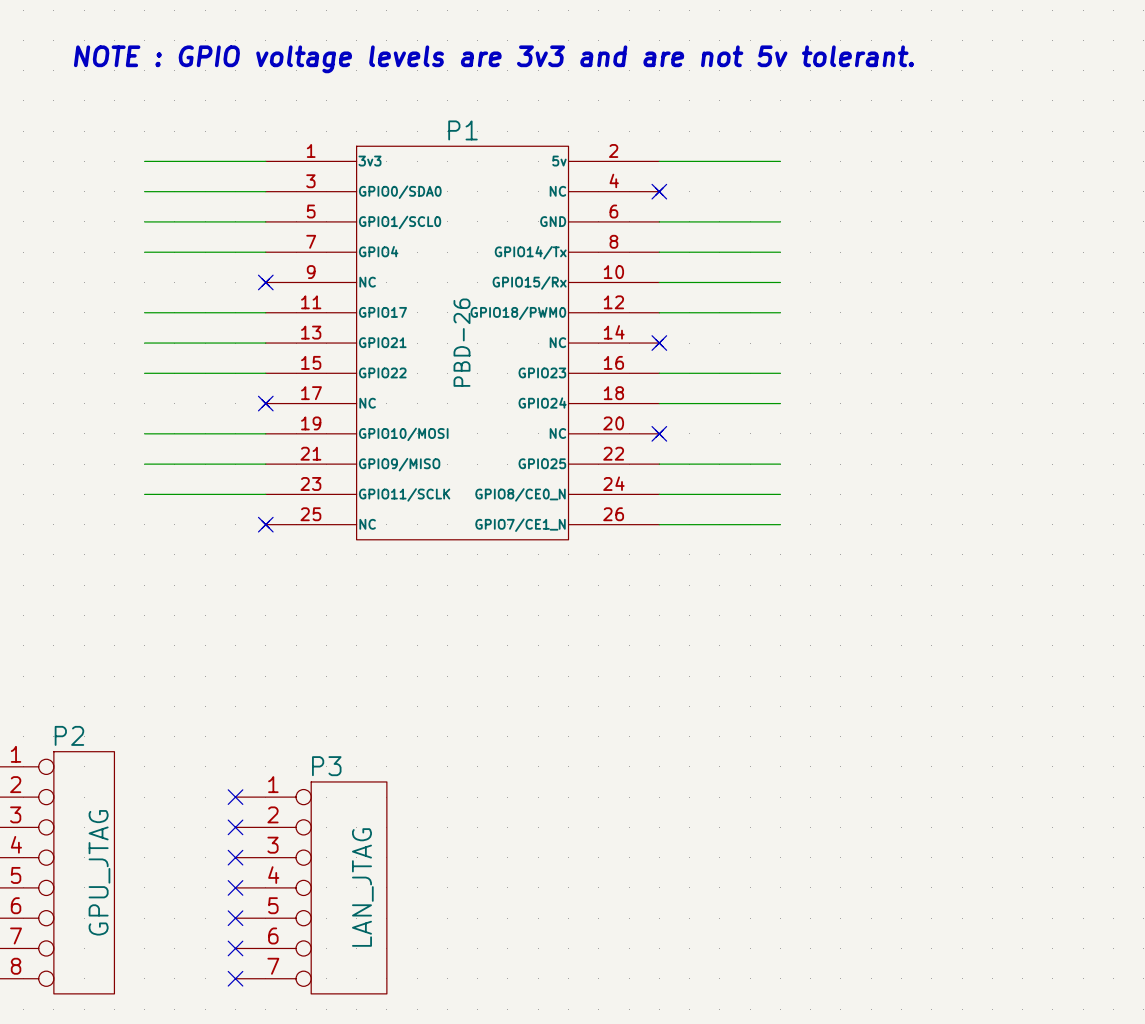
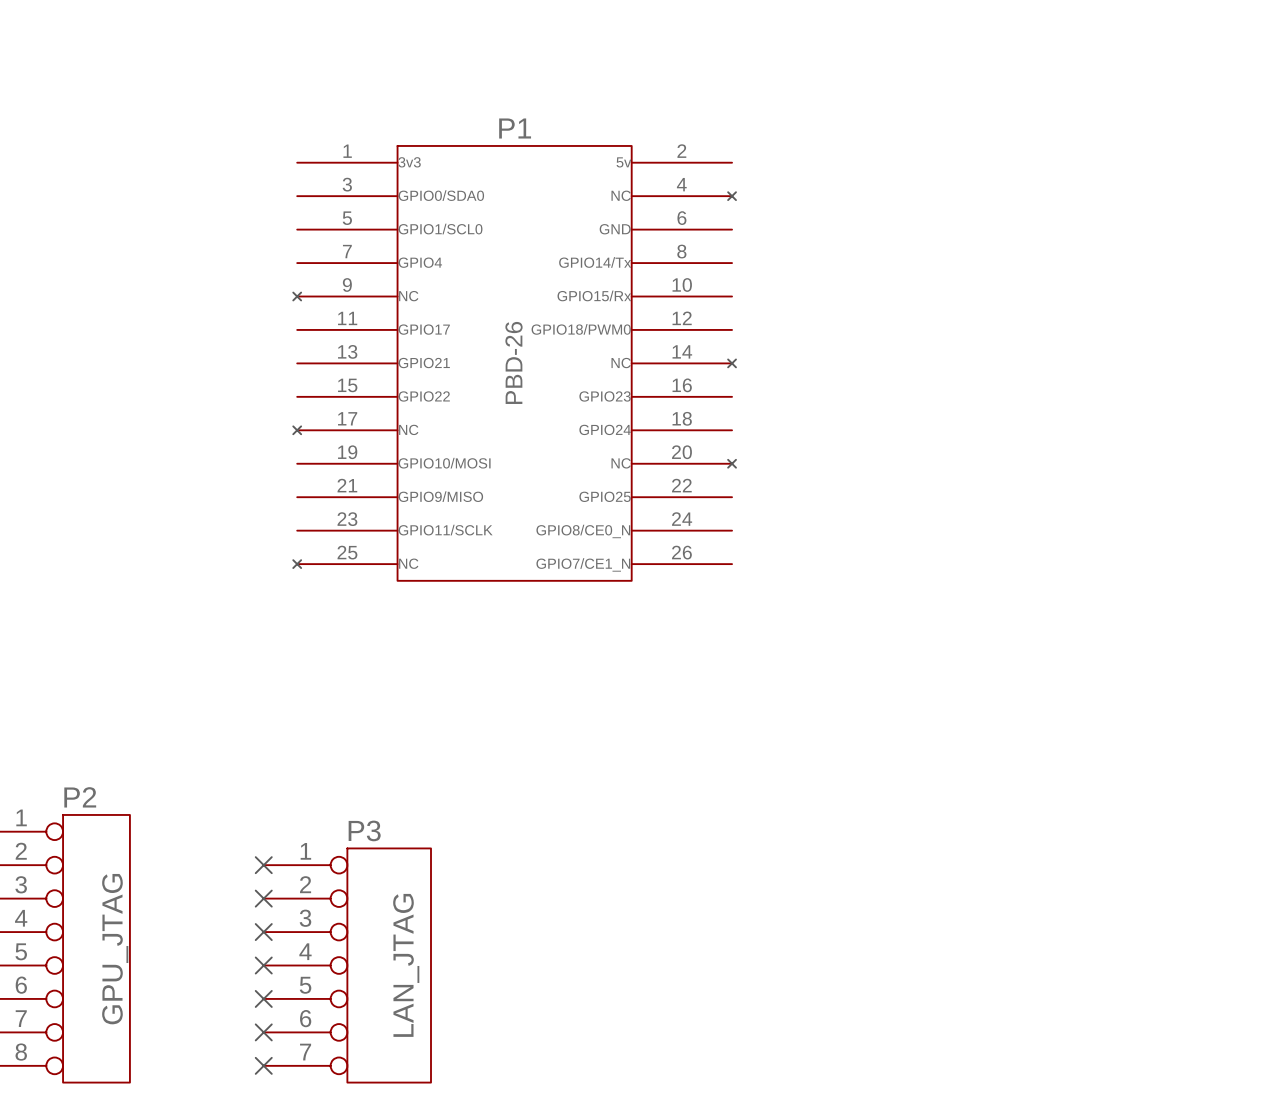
text: NOTE : GPIO voltage levels are 3v3 and are not 5v tolerant. (493, 59) -> none
wire: (144, 161) (265, 161) -> none
wire: (659, 161) (780, 161) -> none
wire: (144, 191) (265, 191) -> none
no-connect mark: (659, 191) -> none
wire: (144, 221) (265, 221) -> none
wire: (659, 221) (780, 221) -> none
wire: (144, 252) (265, 252) -> none
wire: (659, 252) (780, 252) -> none
no-connect mark: (265, 282) -> none
wire: (659, 282) (780, 282) -> none
wire: (144, 312) (265, 312) -> none
wire: (659, 312) (780, 312) -> none
wire: (144, 343) (265, 343) -> none
no-connect mark: (659, 343) -> none
wire: (144, 373) (265, 373) -> none
wire: (659, 373) (780, 373) -> none
no-connect mark: (265, 403) -> none
wire: (659, 403) (780, 403) -> none
wire: (144, 433) (265, 433) -> none
no-connect mark: (659, 433) -> none
wire: (144, 464) (265, 464) -> none
wire: (659, 464) (780, 464) -> none
wire: (144, 494) (265, 494) -> none
wire: (659, 494) (780, 494) -> none
no-connect mark: (265, 524) -> none
wire: (659, 524) (780, 524) -> none

